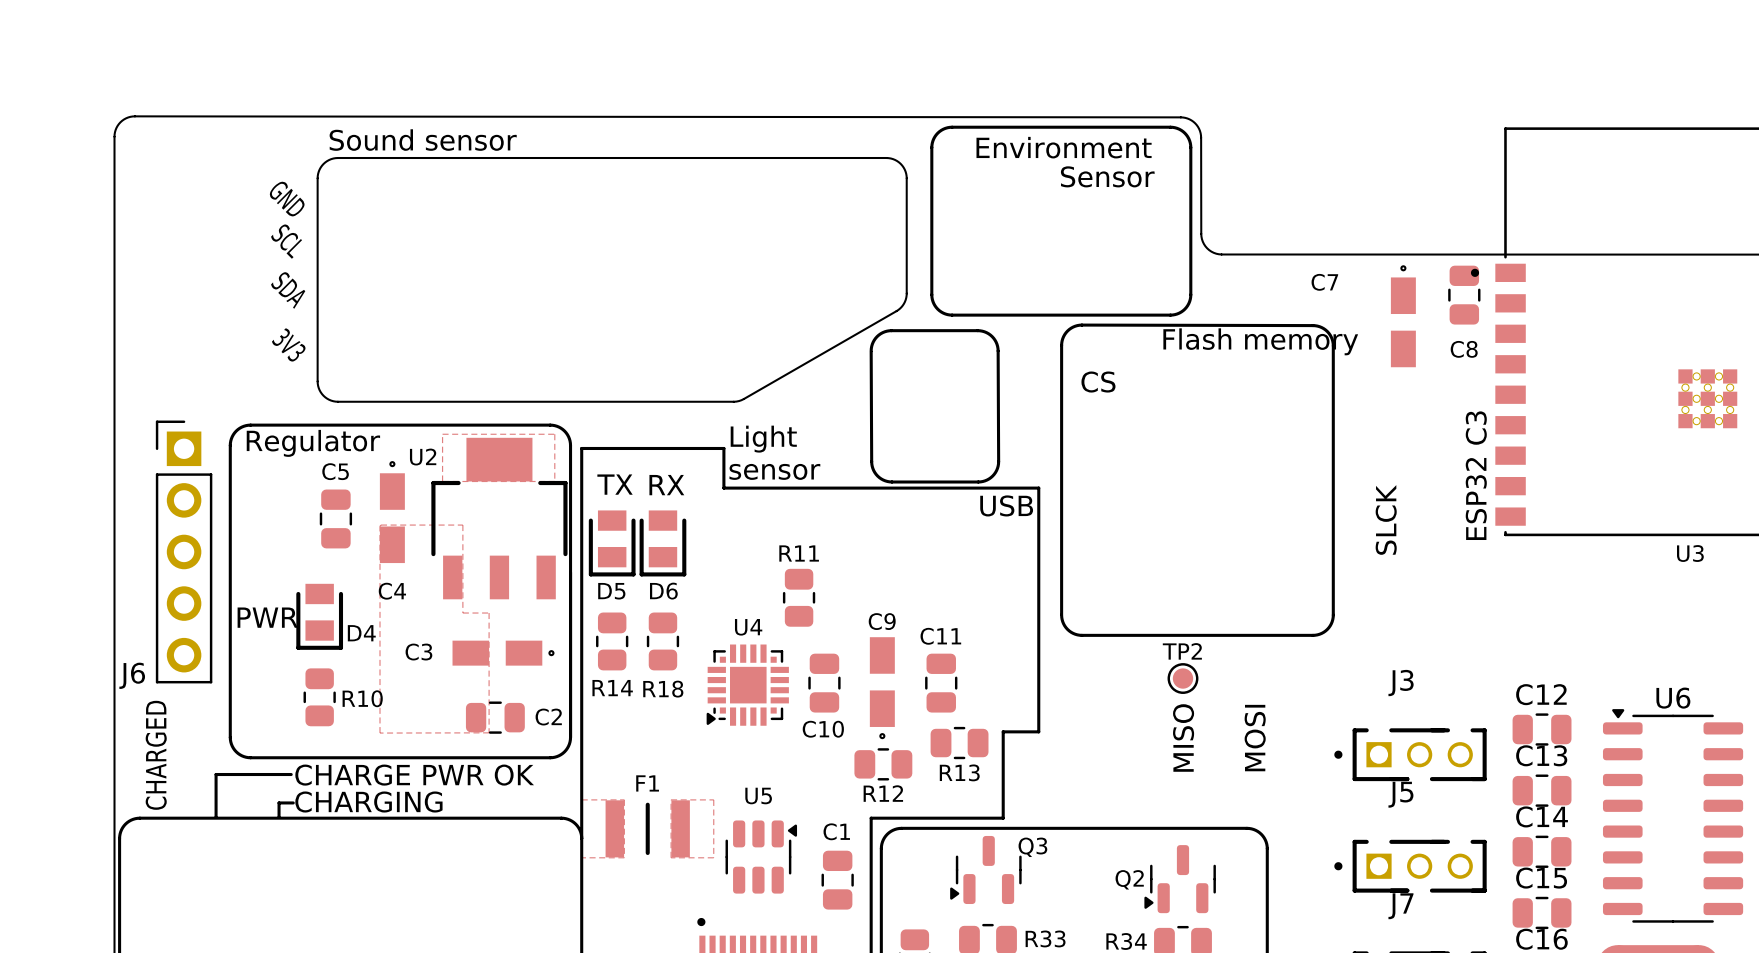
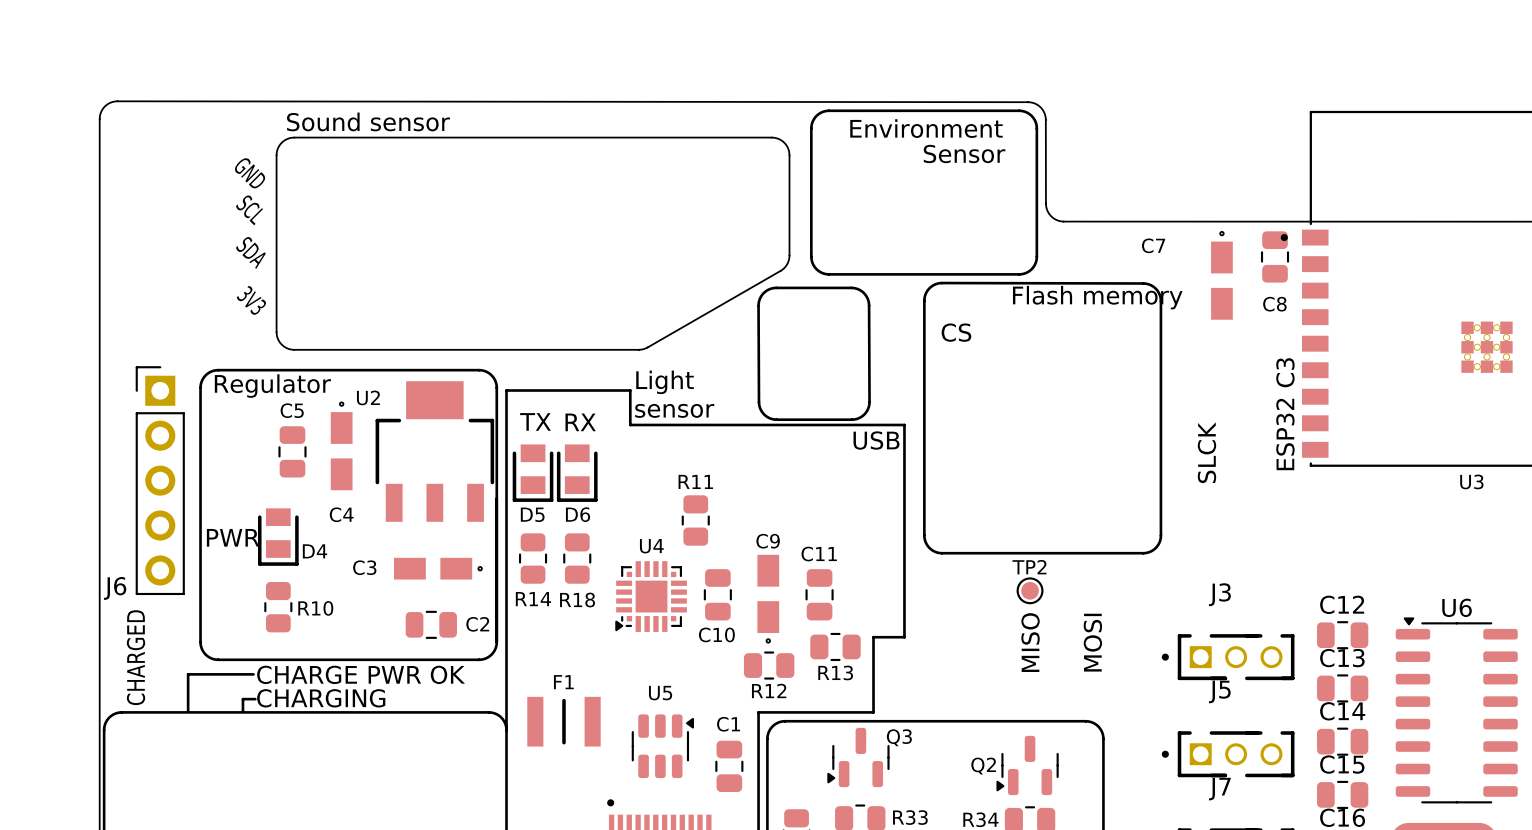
zone outline: (442, 434) (554, 434) (554, 481) (442, 481) (442, 434) -> none
zone outline: (381, 525) (380, 733) (489, 732) (489, 613) (462, 613) (462, 525) (381, 525) -> none
zone outline: (581, 799) (624, 799) (624, 857) (581, 857) (581, 799) -> none
zone outline: (671, 799) (713, 799) (713, 857) (671, 857) (671, 799) -> none

